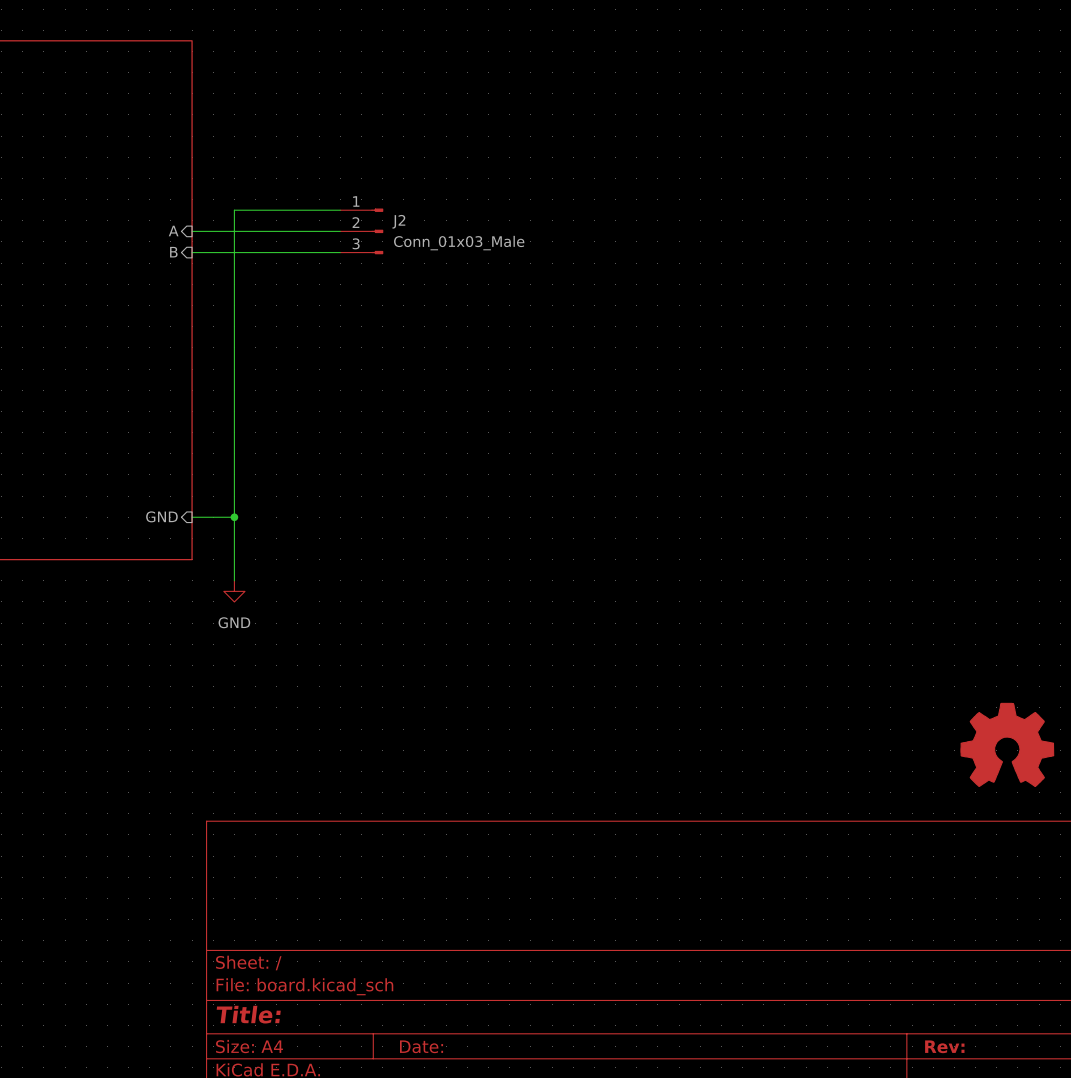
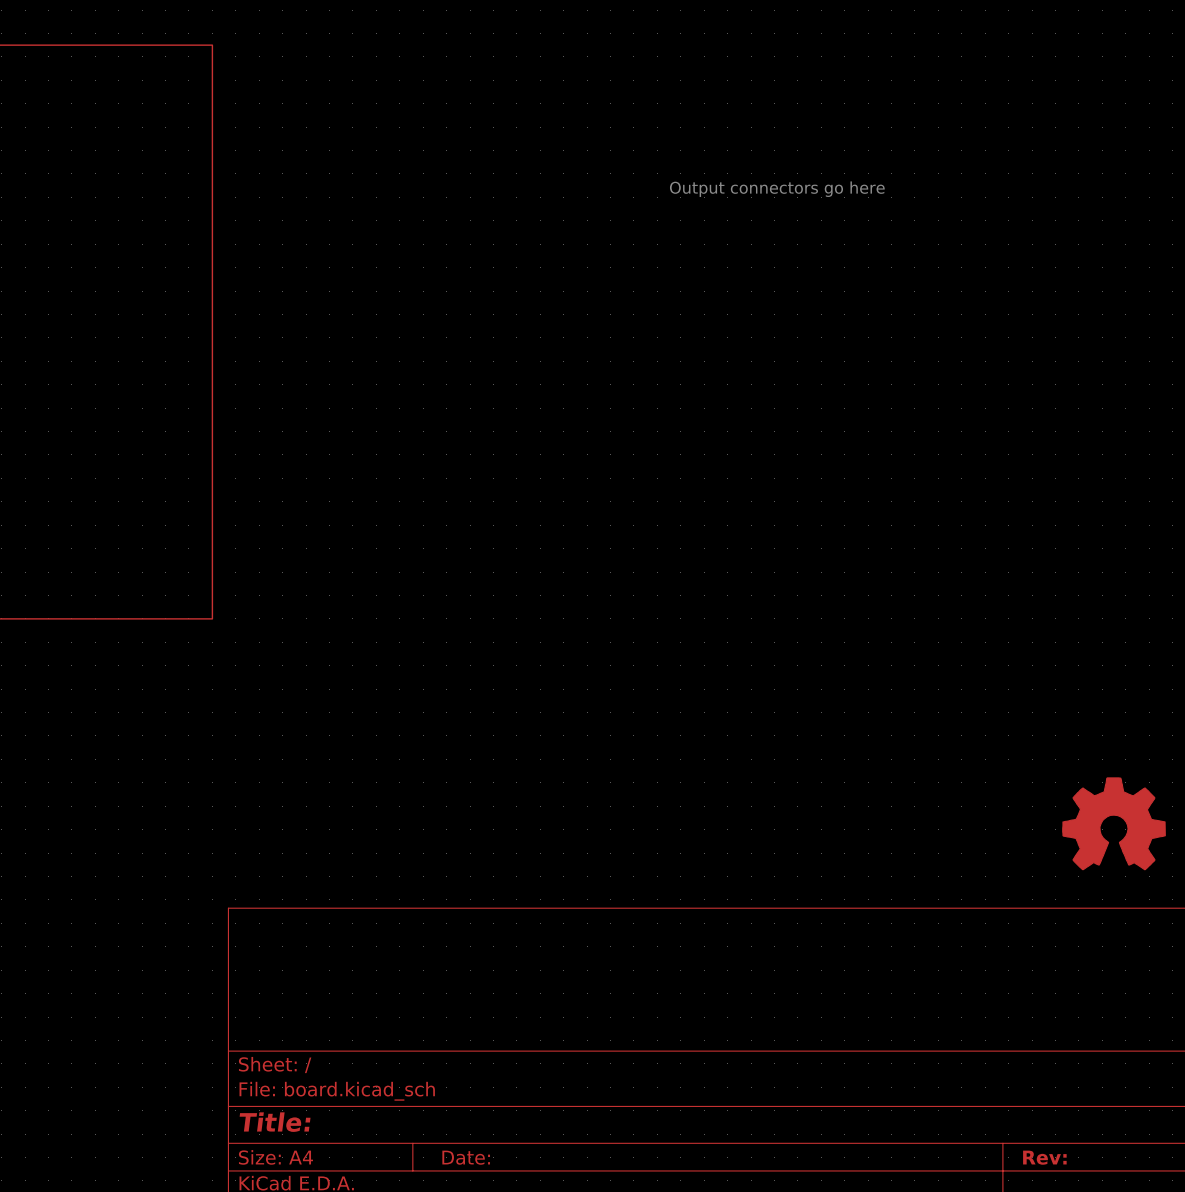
text: none -> Output connectors go here (777, 189)
wire: (340, 210) (234, 210) (234, 580) -> none
sheet pin: A (173, 231) -> none
wire: (192, 231) (340, 231) -> none
J2: Conn_01x03_Male (361, 231) -> none
sheet pin: B (173, 252) -> none
wire: (192, 252) (340, 252) -> none
sheet pin: GND (161, 516) -> none
wire: (192, 517) (234, 517) -> none
junction: (234, 517) -> none
power symbol: GND (234, 591) -> none

